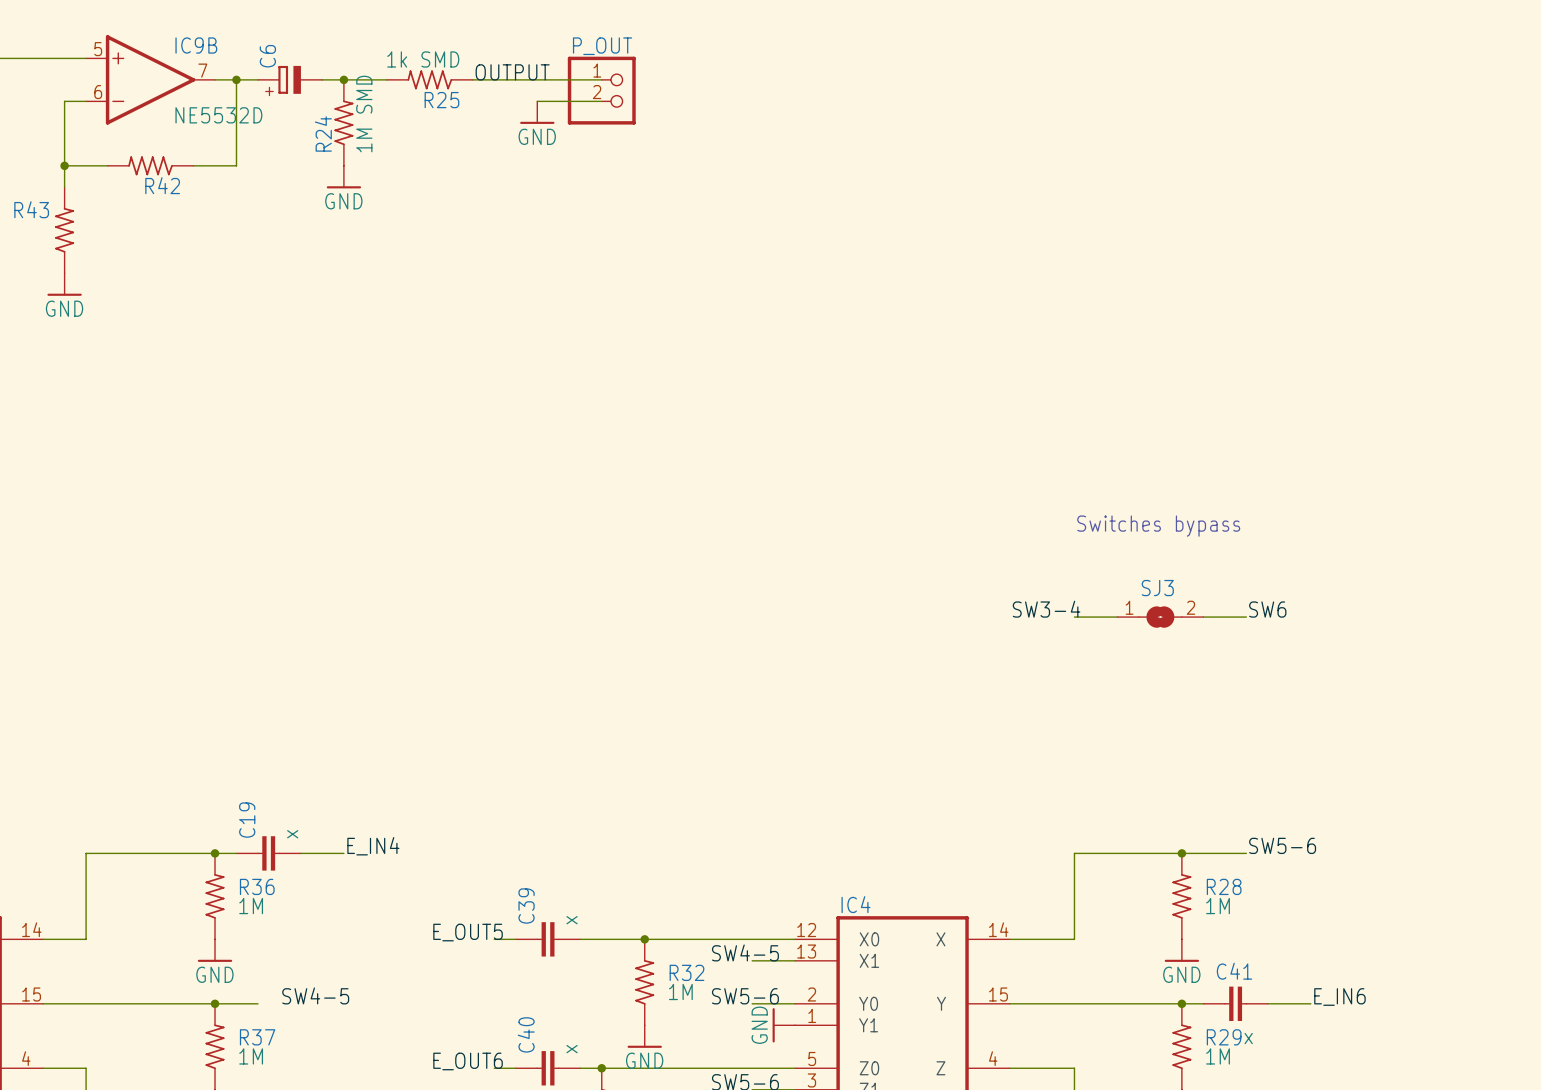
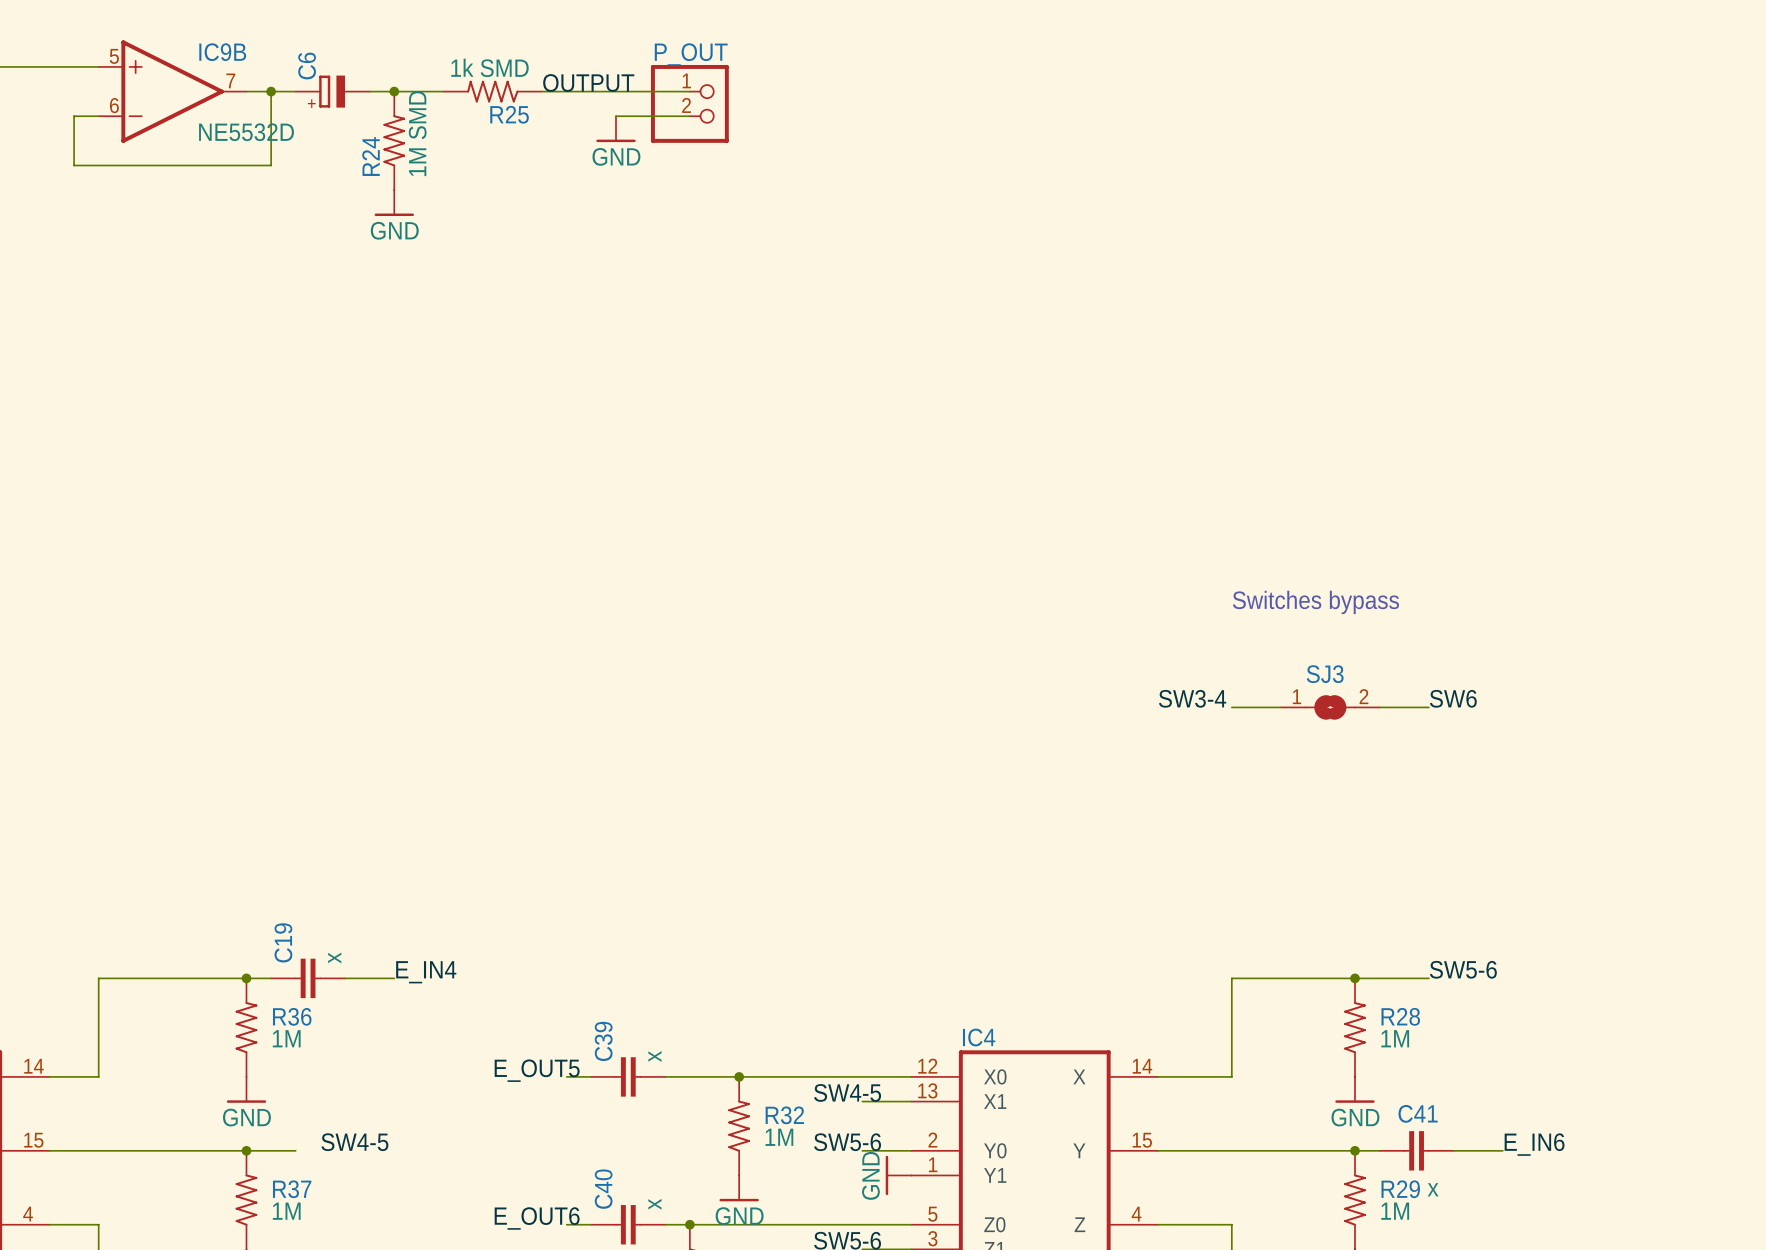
wire: (64, 144) (64, 187) -> none
wire: (236, 144) (236, 165) (193, 165) -> (271, 165) (74, 165)
wire: (64, 165) (107, 165) -> none
junction: (64, 165) -> none
R42: (150, 165) -> none
R43: (64, 230) -> none
power symbol: GND (64, 284) -> none

